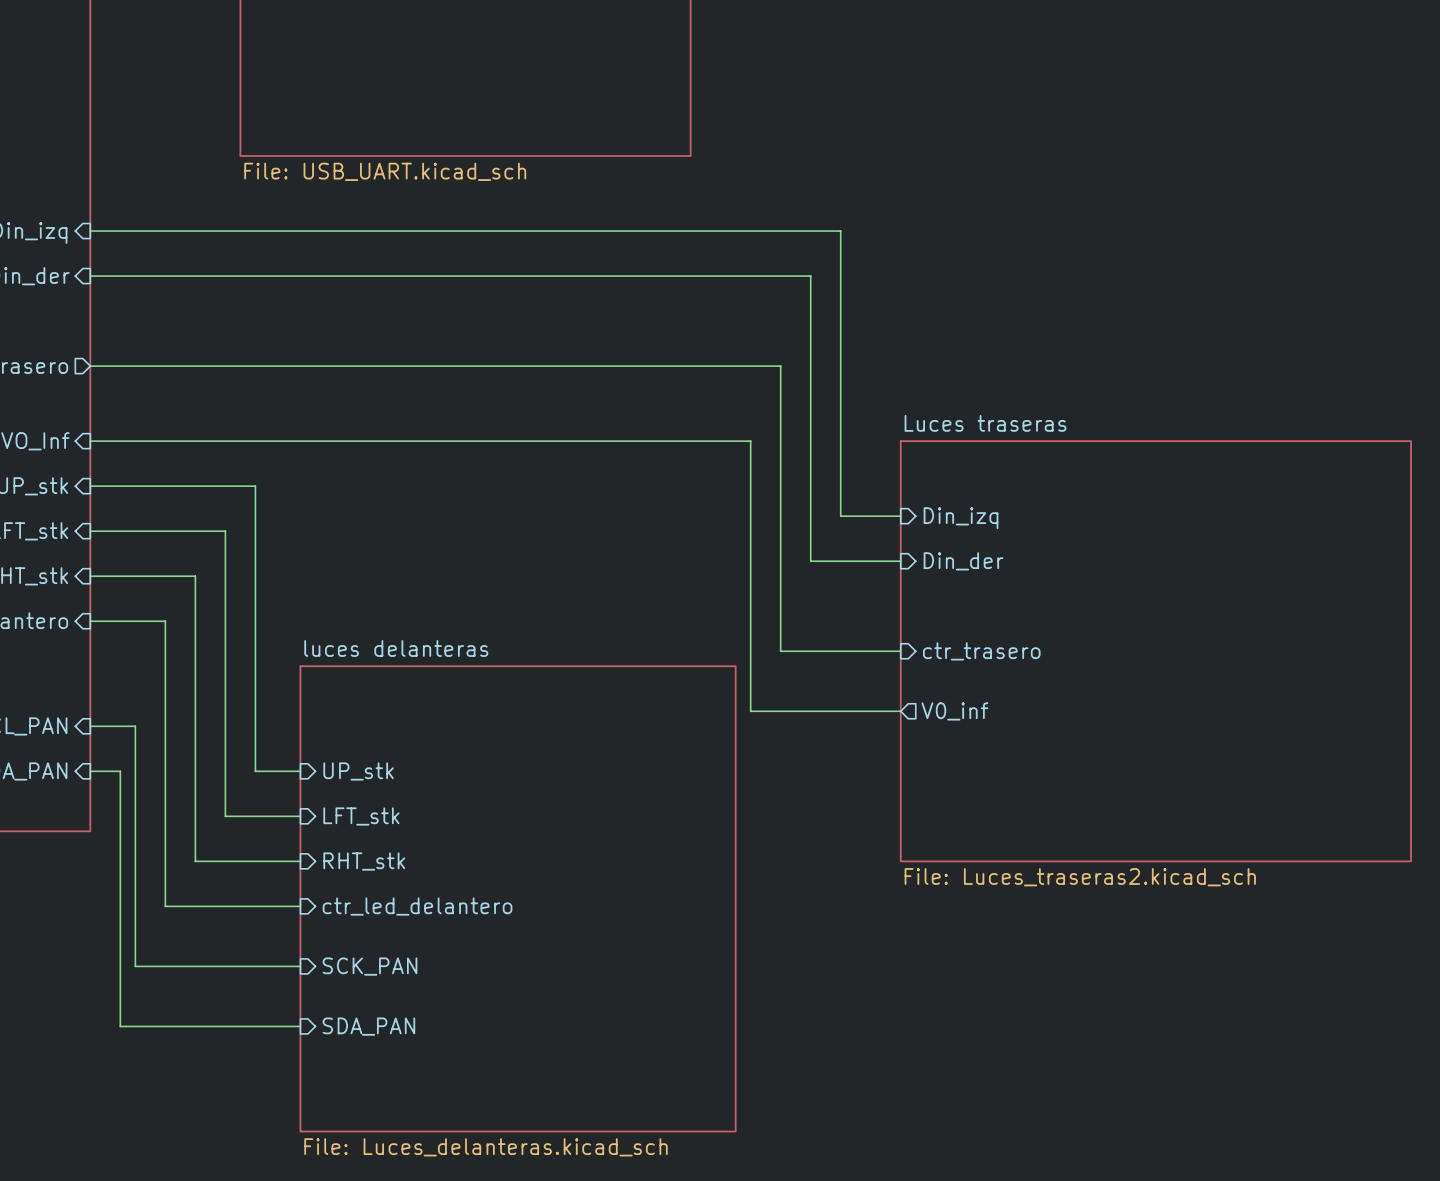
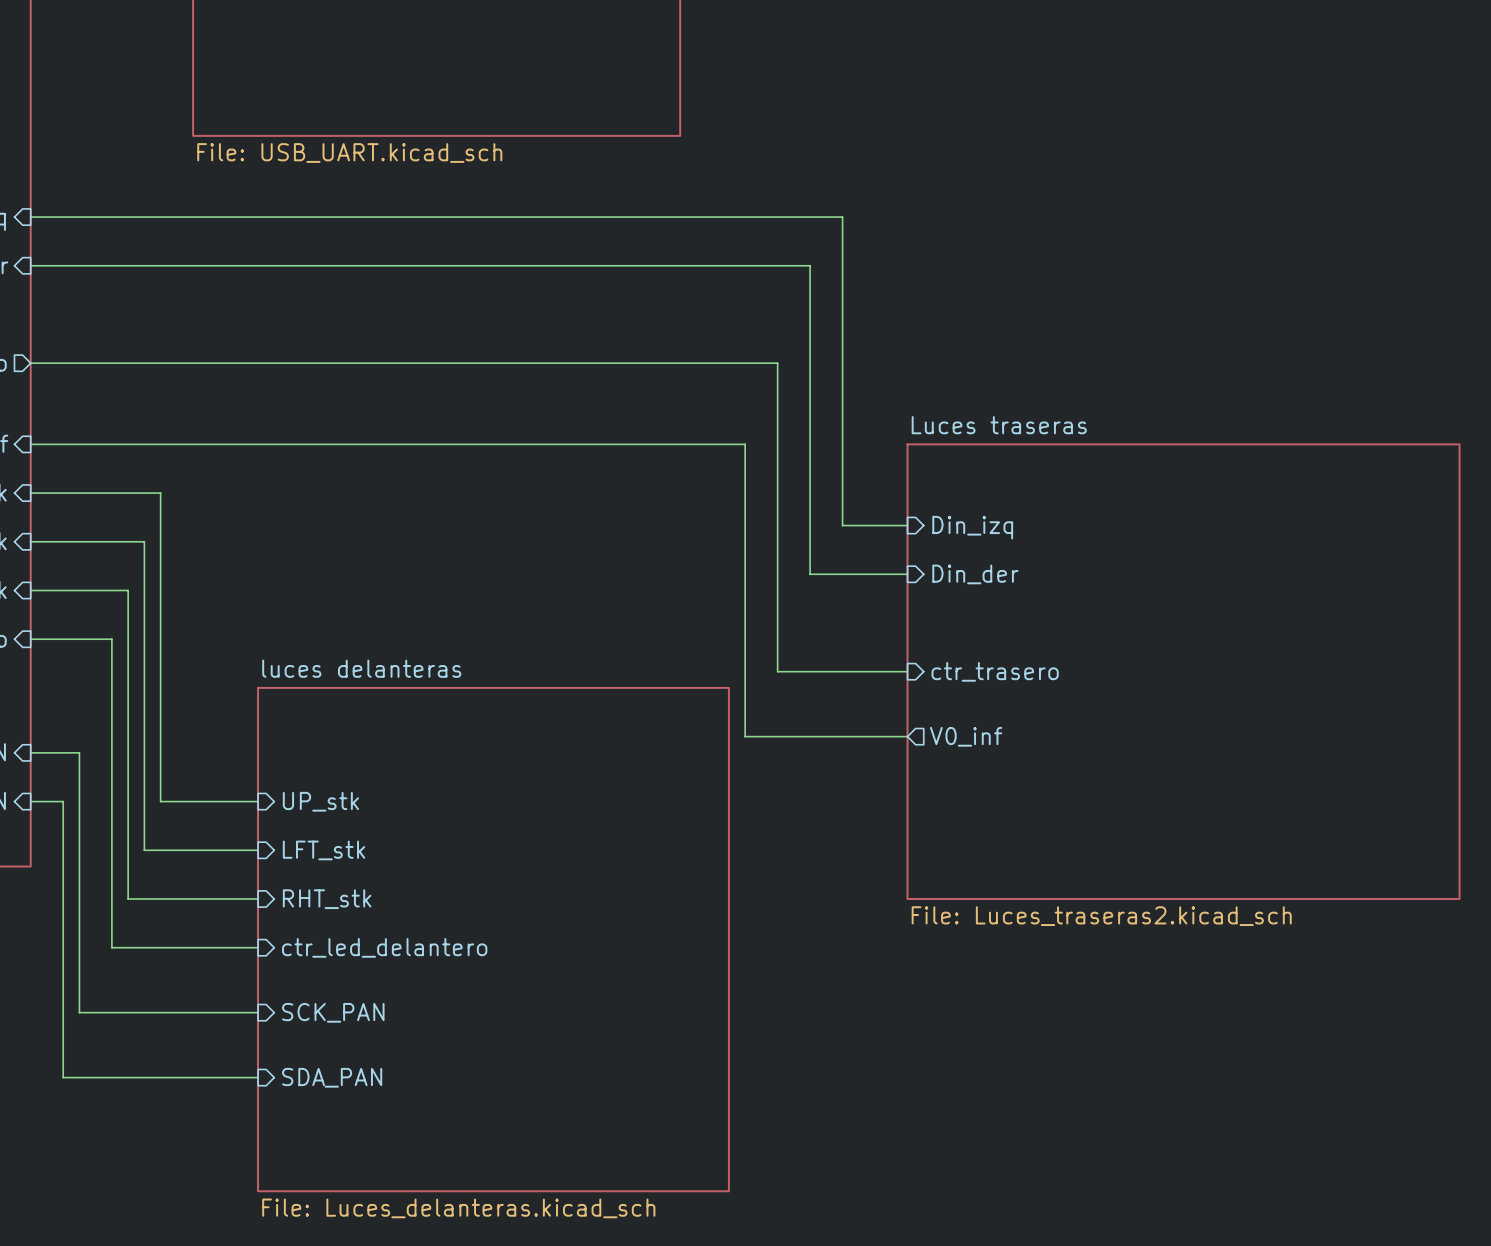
wire: (210, 486) (255, 486) (255, 771) -> (160, 493) (160, 801) (209, 801)
wire: (195, 531) (225, 531) (225, 816) -> none
wire: (180, 576) (195, 576) -> (144, 541) (144, 590)
wire: none -> (128, 590) (128, 899) (144, 899)
wire: (195, 816) (195, 861) -> (144, 850) (176, 850)

